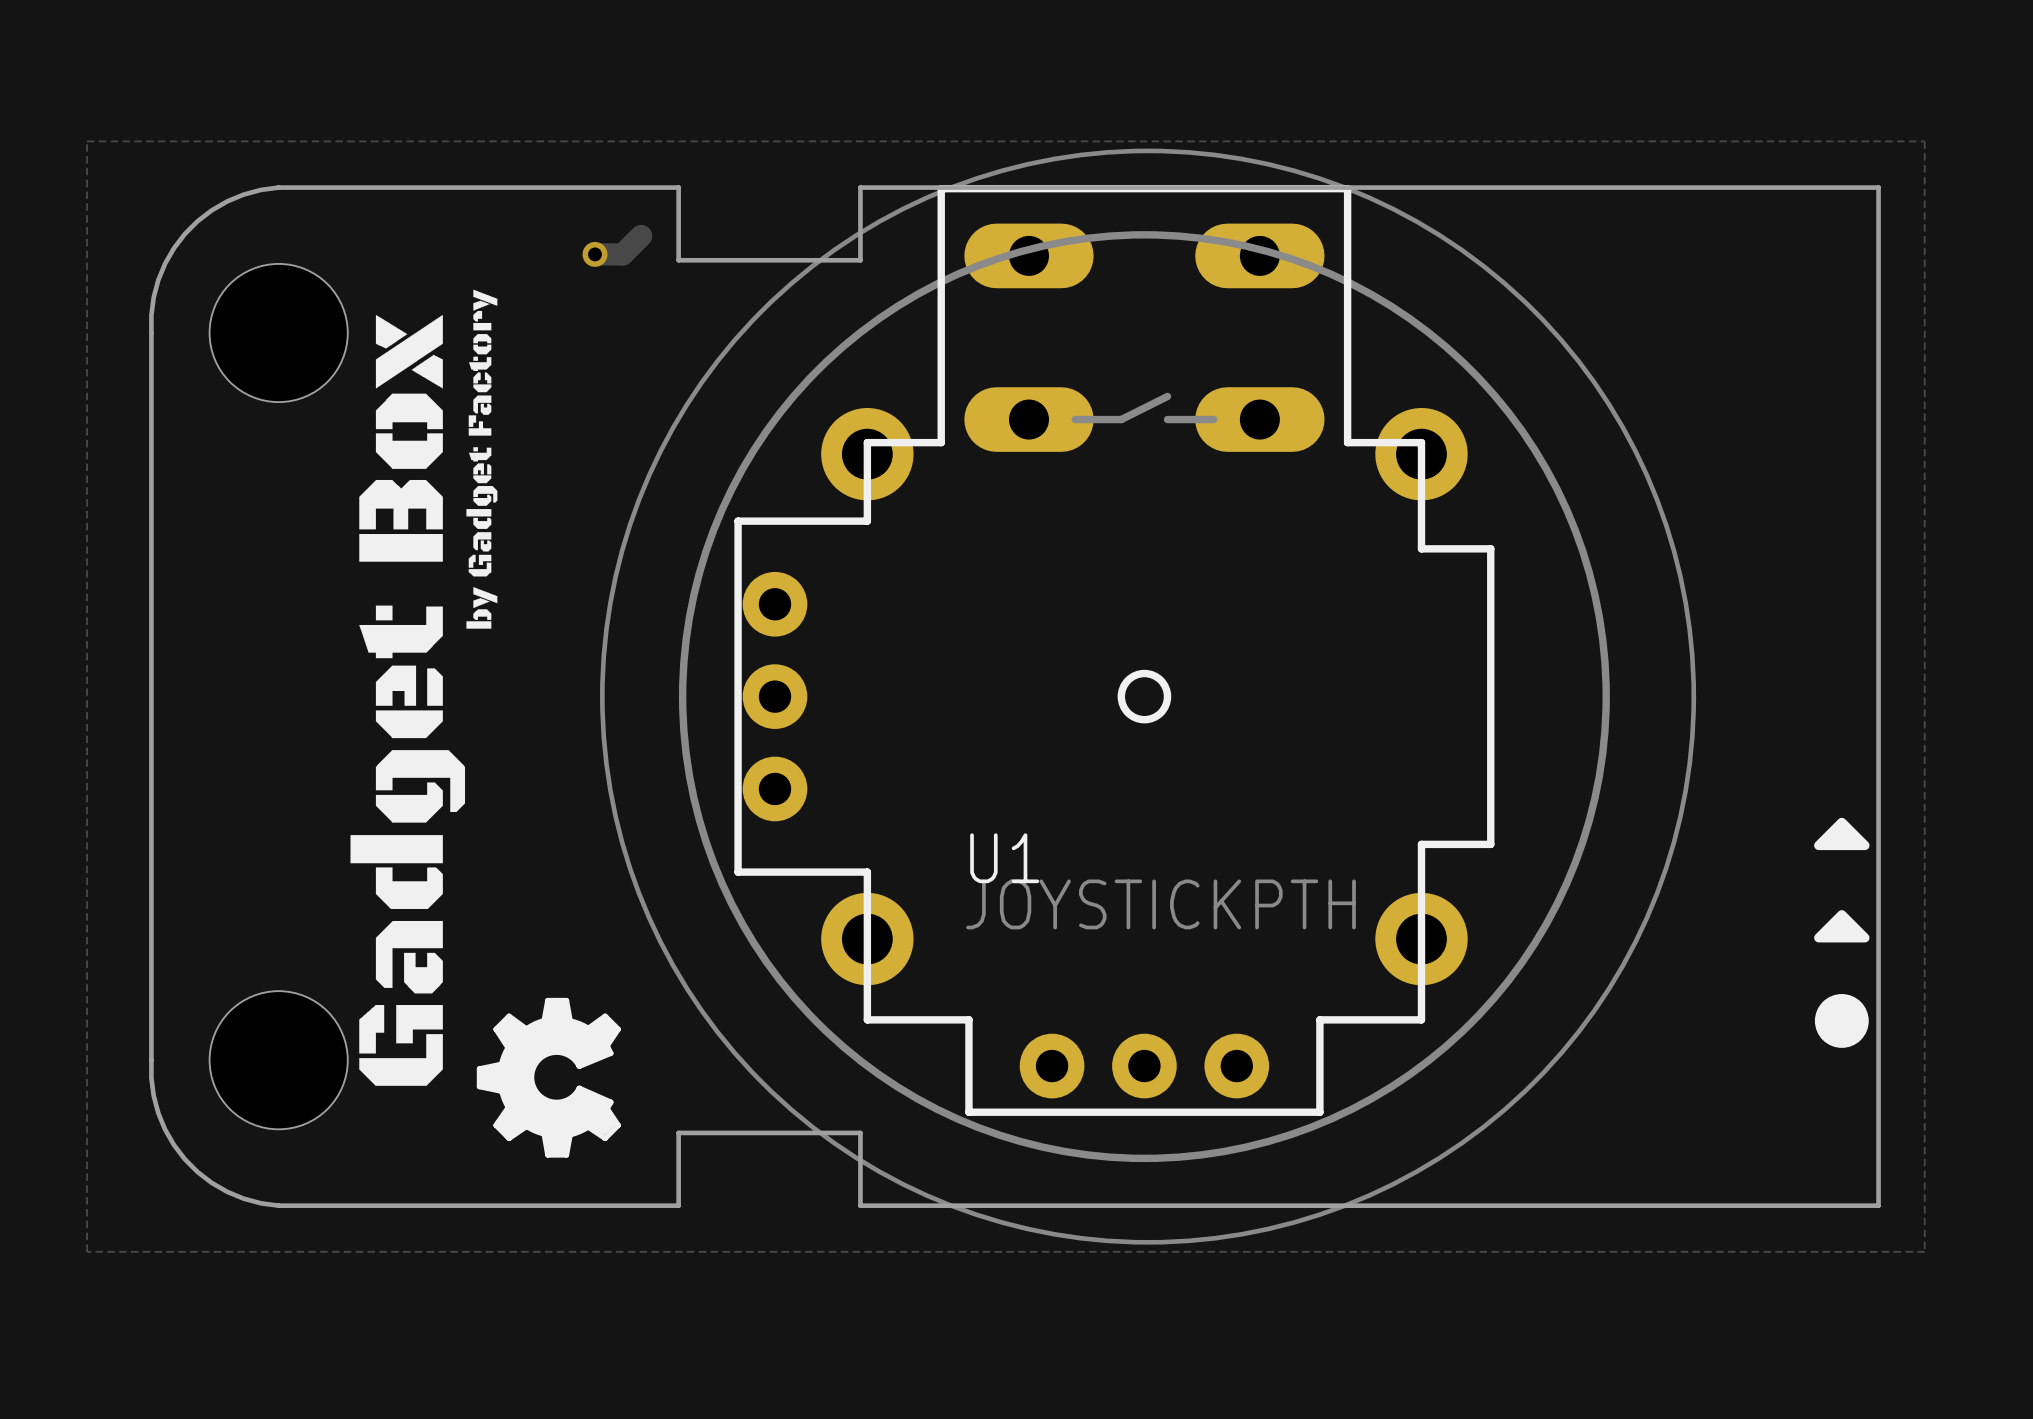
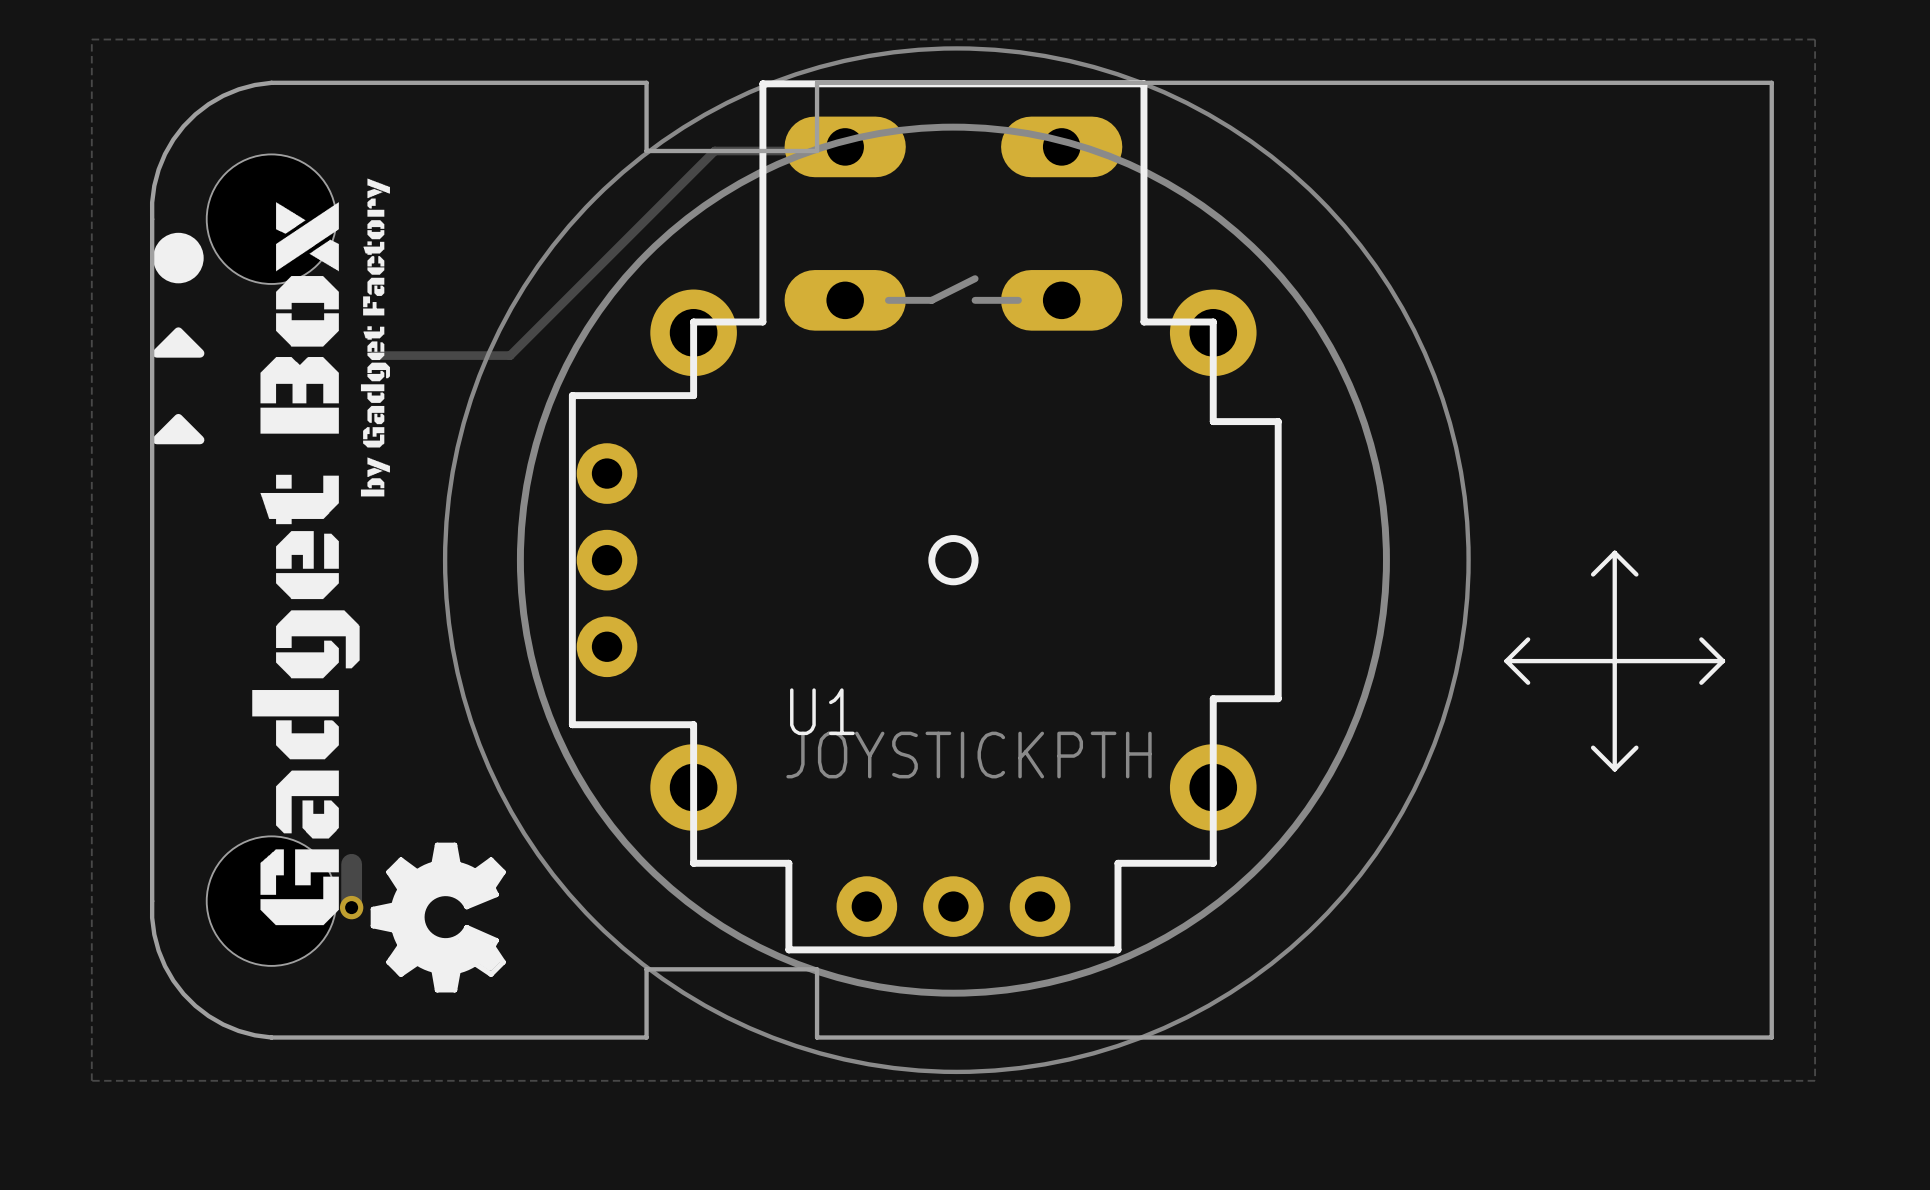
track: (641, 235) (622, 254) (595, 254) -> none
via: (595, 254) -> none
track: none -> (845, 146) (841, 151) (714, 151) (510, 355) (373, 355)
drawing: none -> [153, 232, 204, 284]
drawing: none -> [152, 327, 205, 358]
drawing: none -> [152, 413, 205, 445]
drawing position: (423, 687) -> (321, 551)
line: none -> (1614, 552) (1614, 769)
line: none -> (1614, 552) (1593, 574)
line: none -> (1614, 552) (1636, 574)
U1 position: (1148, 696) -> (956, 560)
line: none -> (1528, 639) (1506, 661)
line: none -> (1701, 639) (1722, 661)
line: none -> (1506, 661) (1528, 682)
line: none -> (1506, 661) (1722, 661)
line: none -> (1722, 661) (1701, 682)
drawing: [1814, 817, 1870, 851] -> none
line: none -> (1593, 747) (1614, 769)
line: none -> (1636, 747) (1614, 769)
drawing: [1814, 910, 1870, 943] -> none
drawing: [1814, 994, 1869, 1048] -> none
track: none -> (351, 864) (351, 907)
via: none -> (351, 907)
drawing position: (548, 1077) -> (438, 917)

